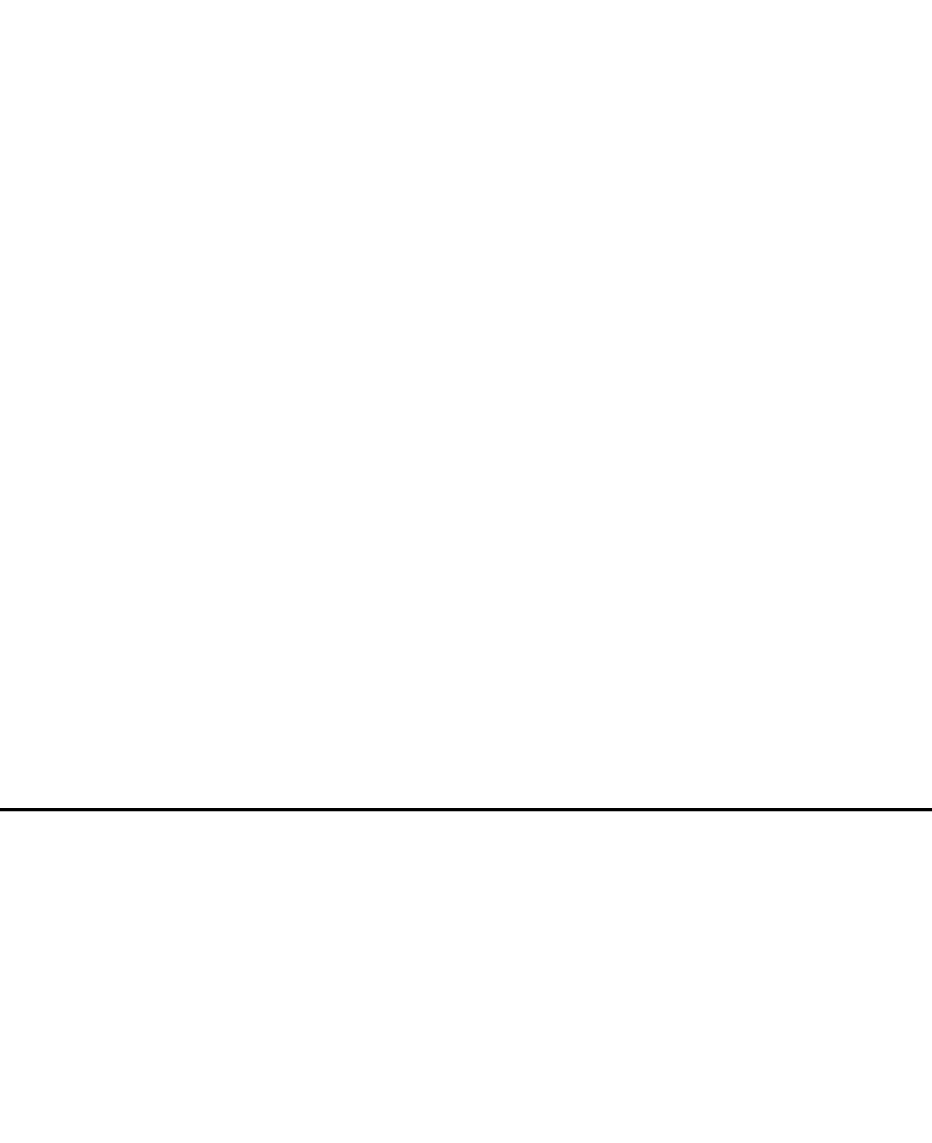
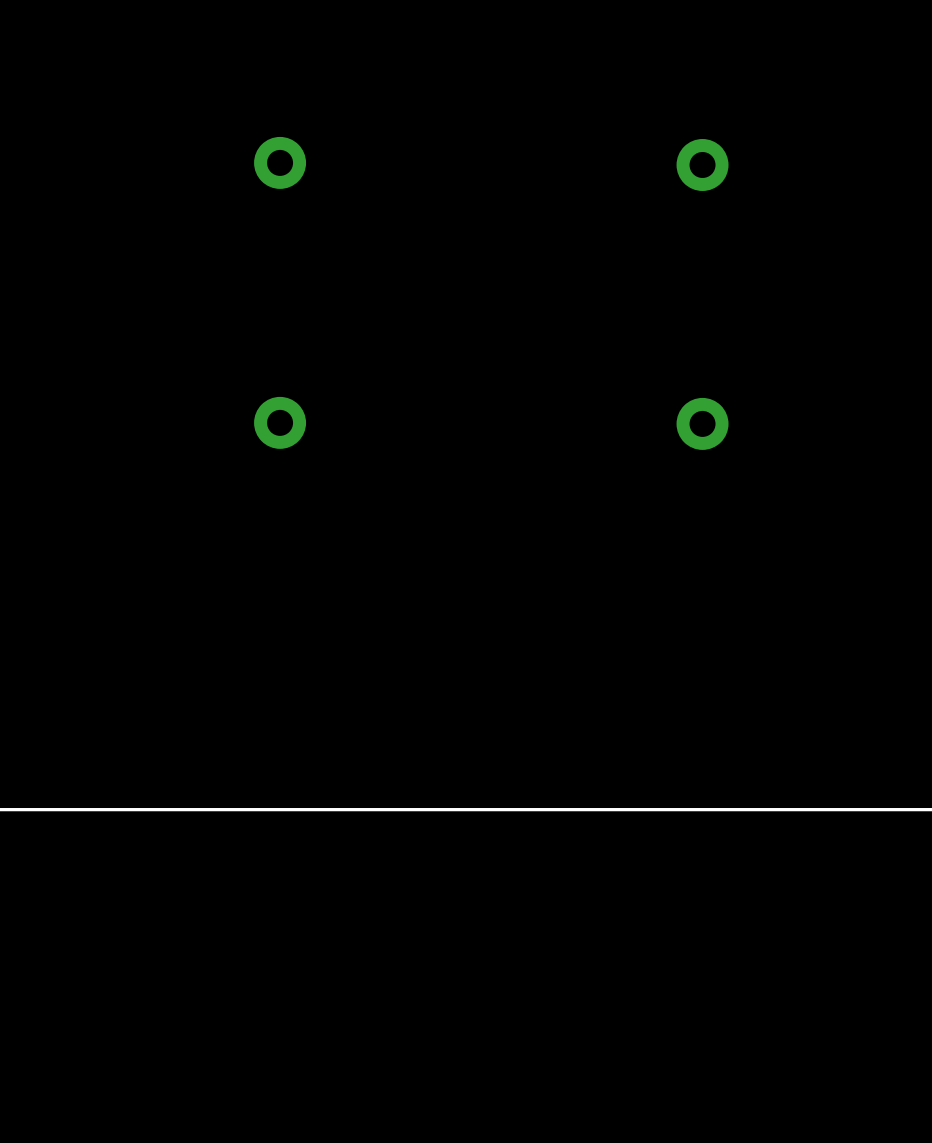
via: none -> (280, 162)
via: none -> (702, 165)
via: none -> (280, 422)
via: none -> (702, 423)

